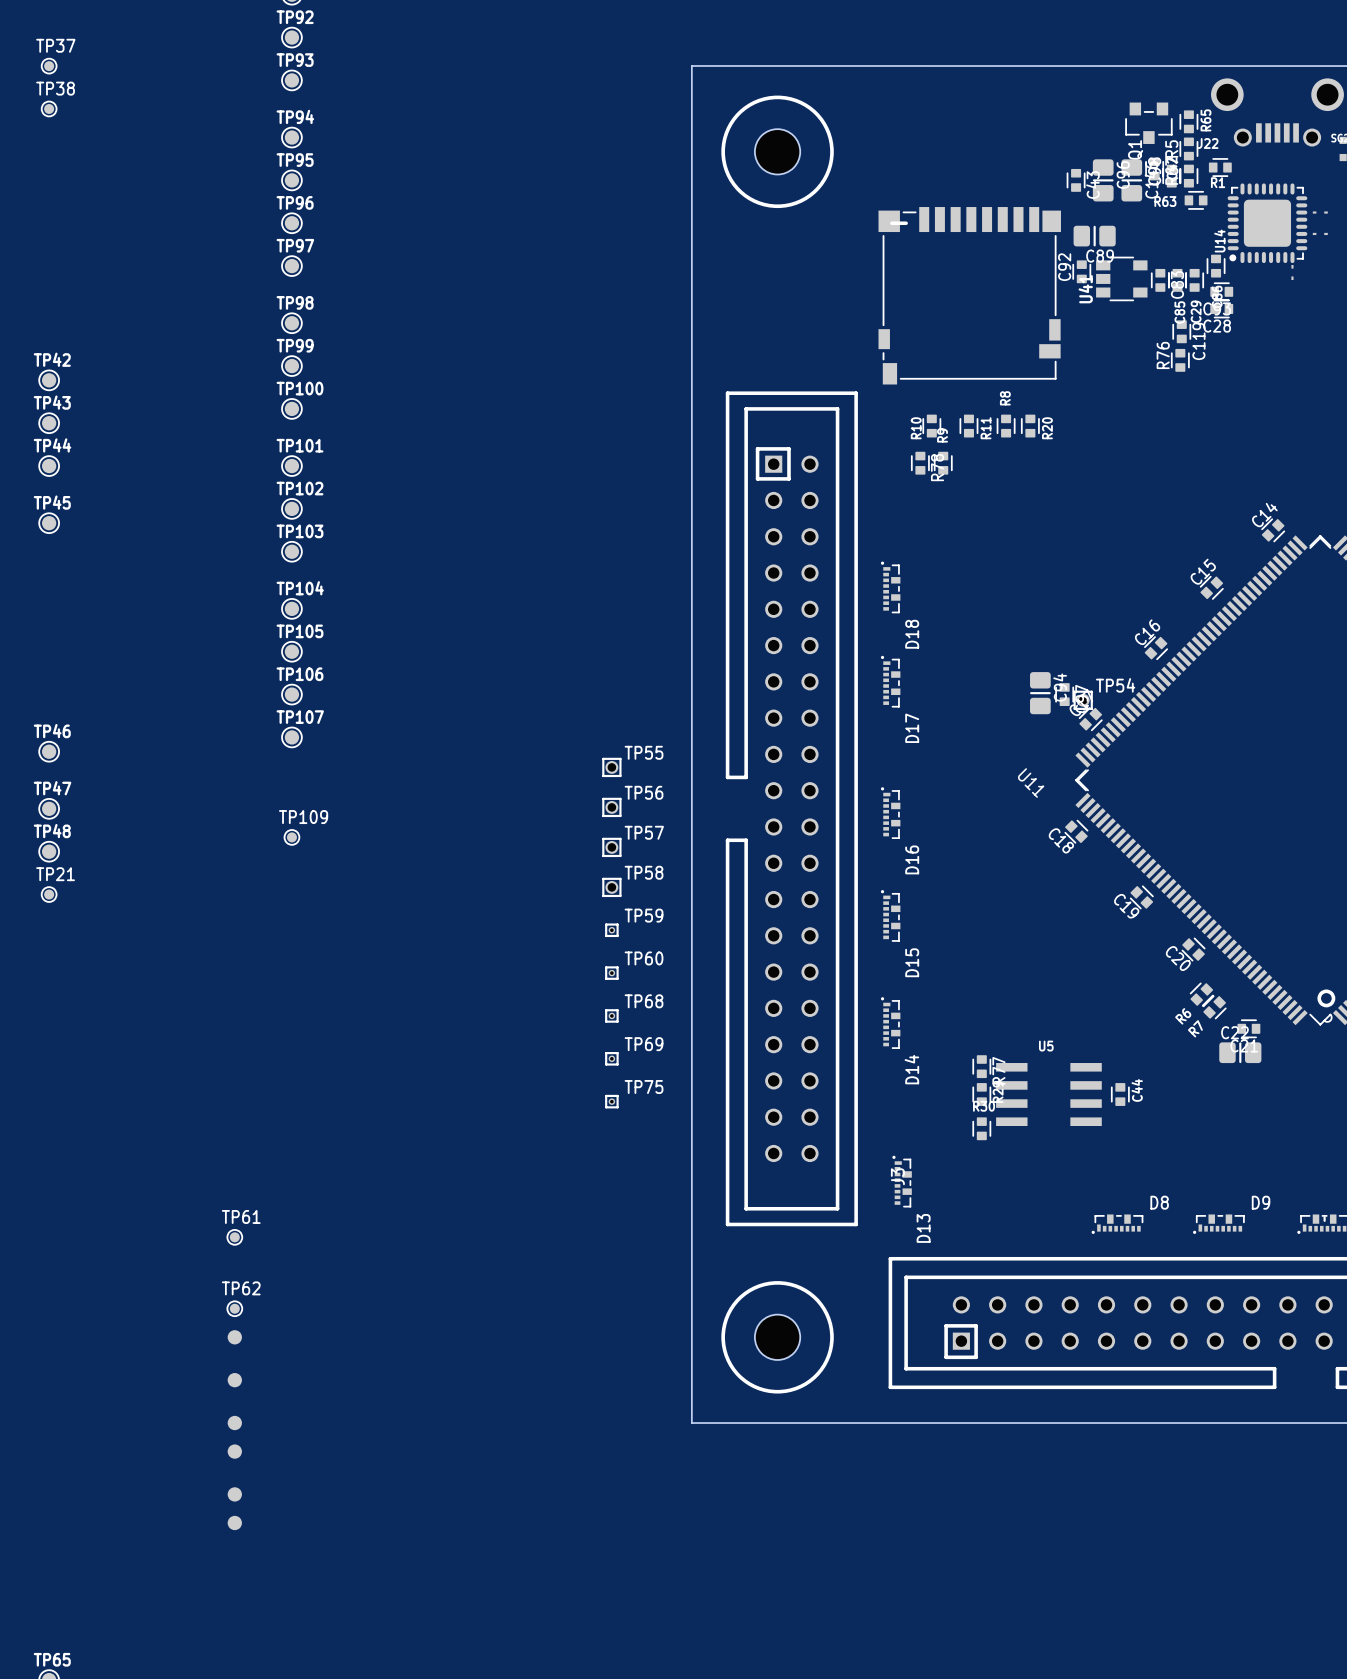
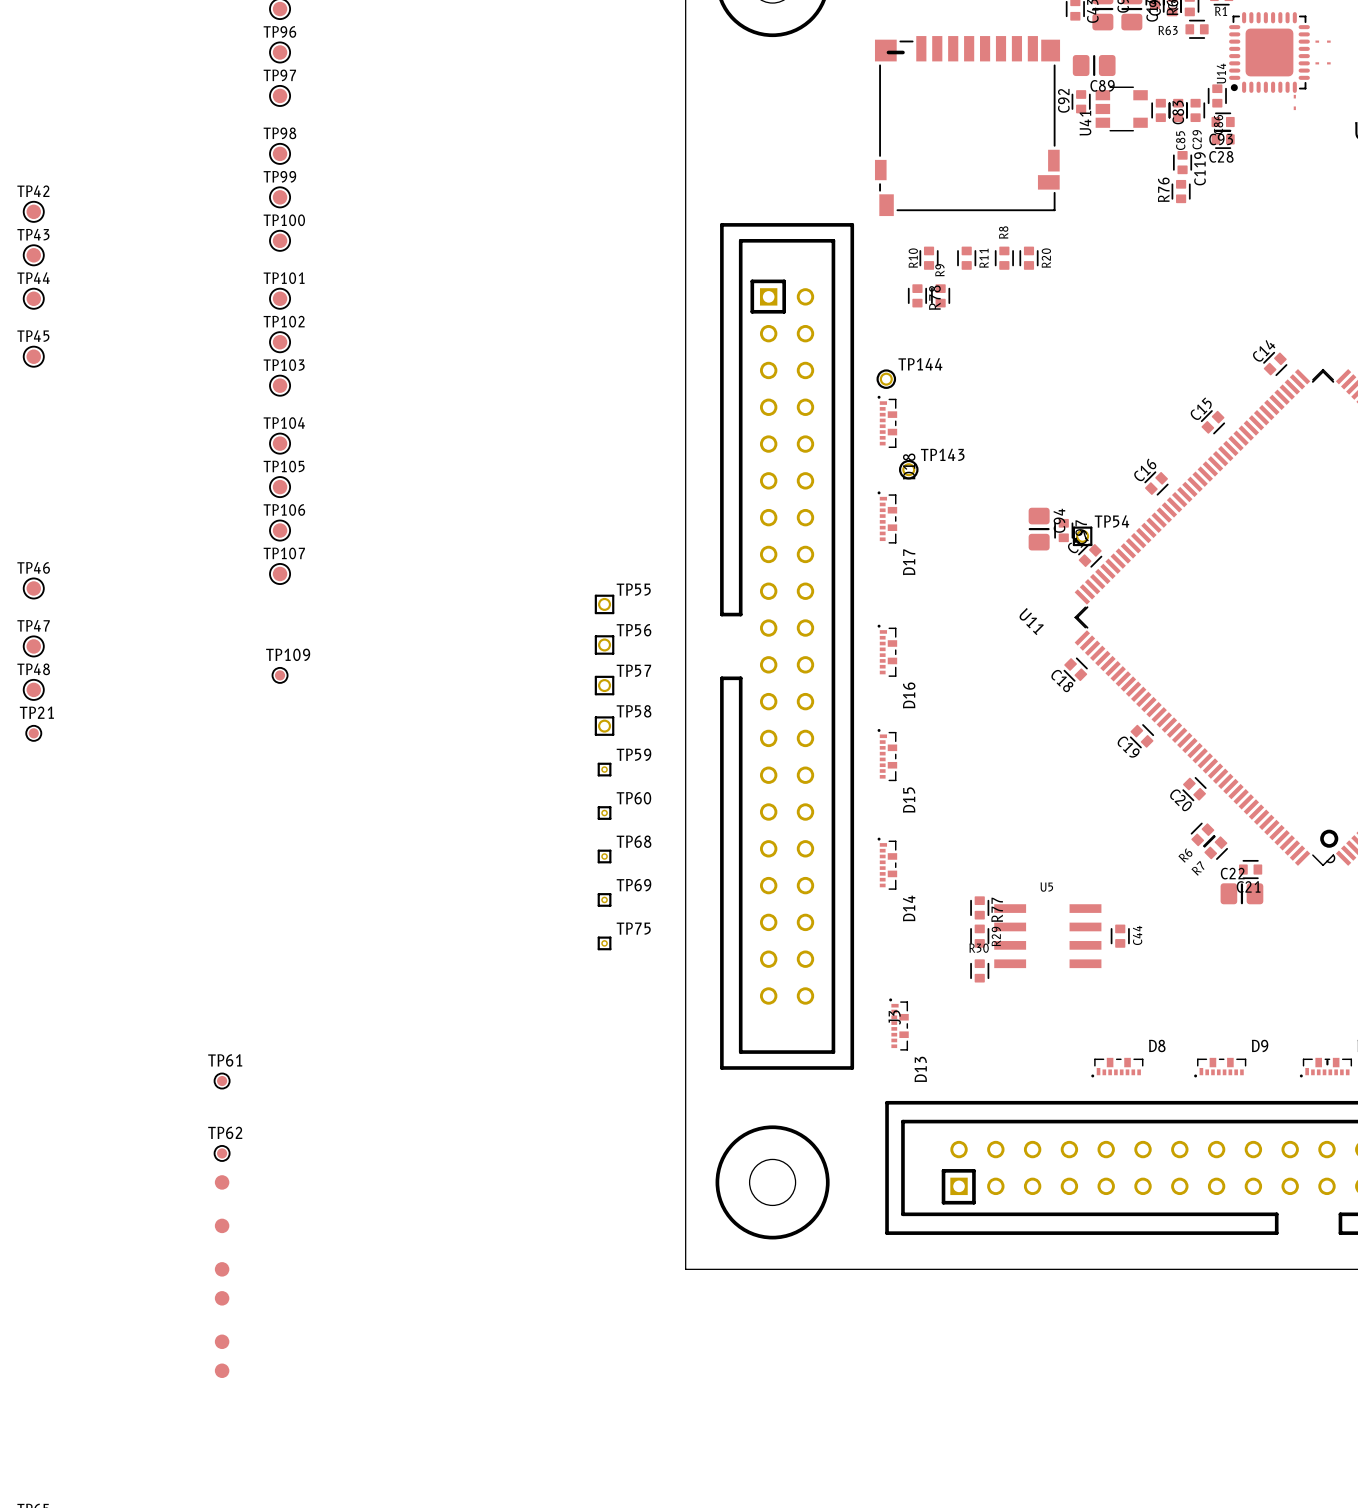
TP144: none -> (886, 379)
TP143: none -> (908, 469)

